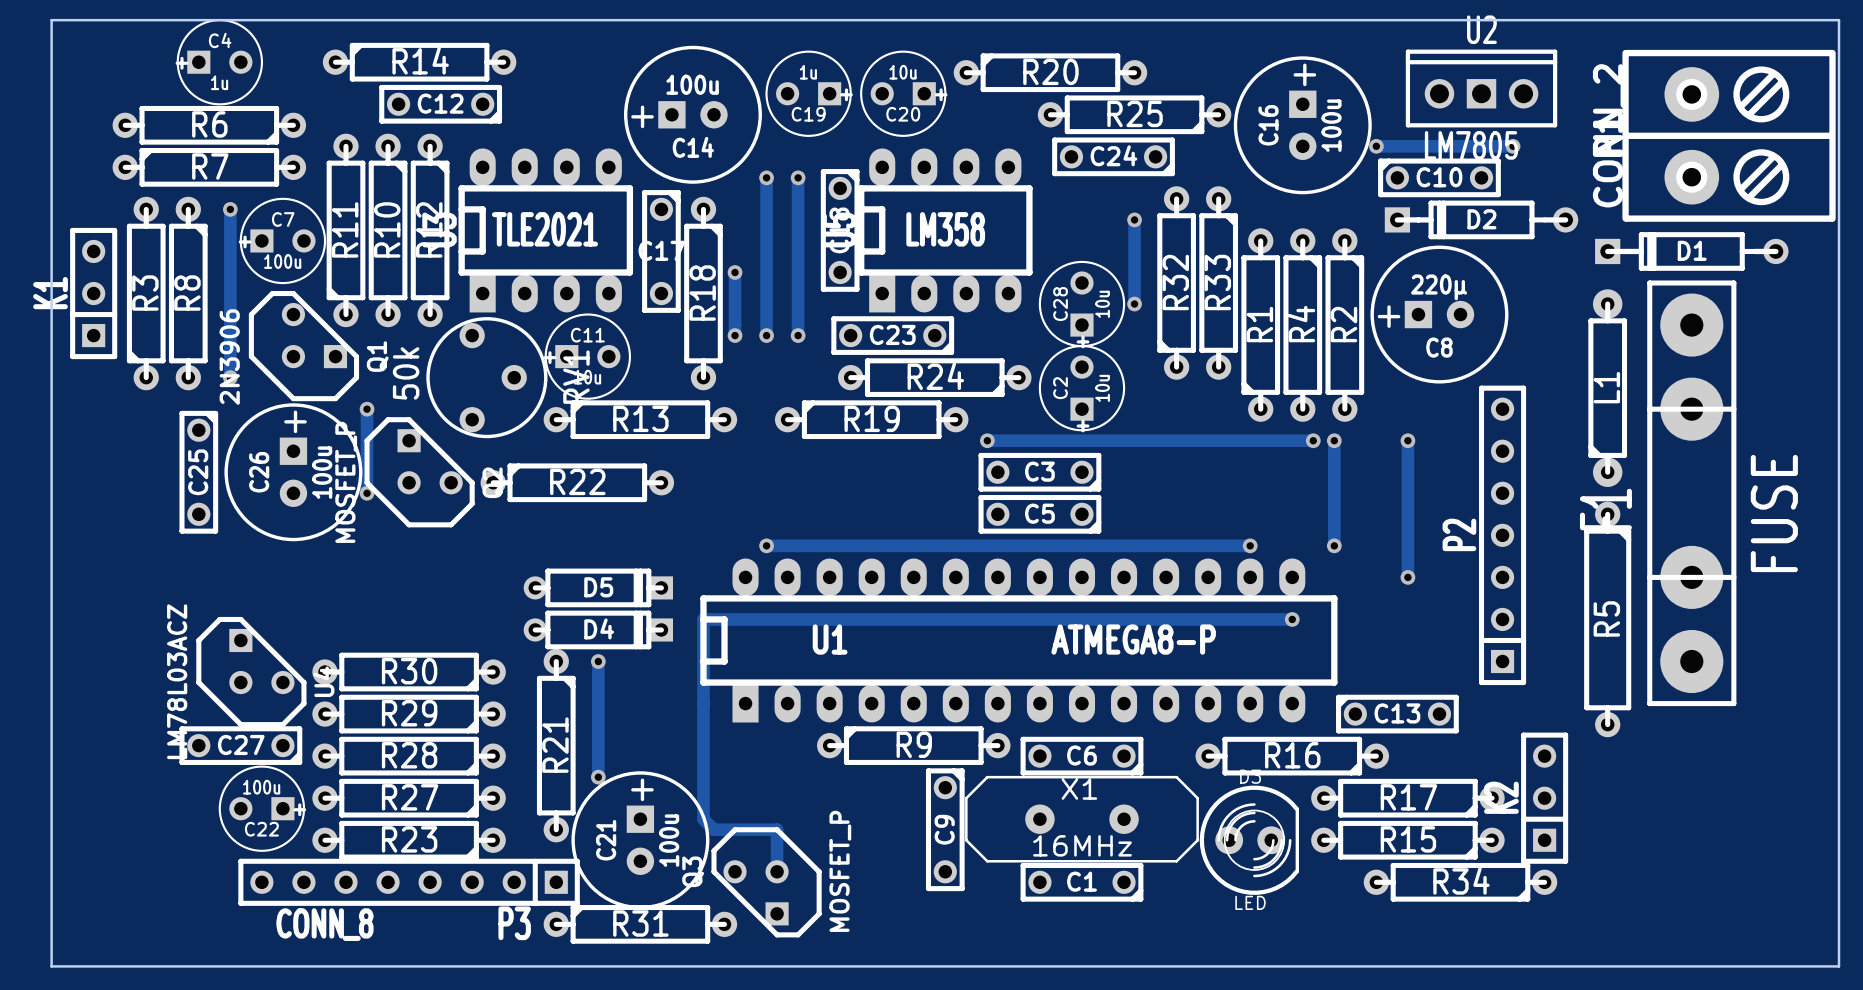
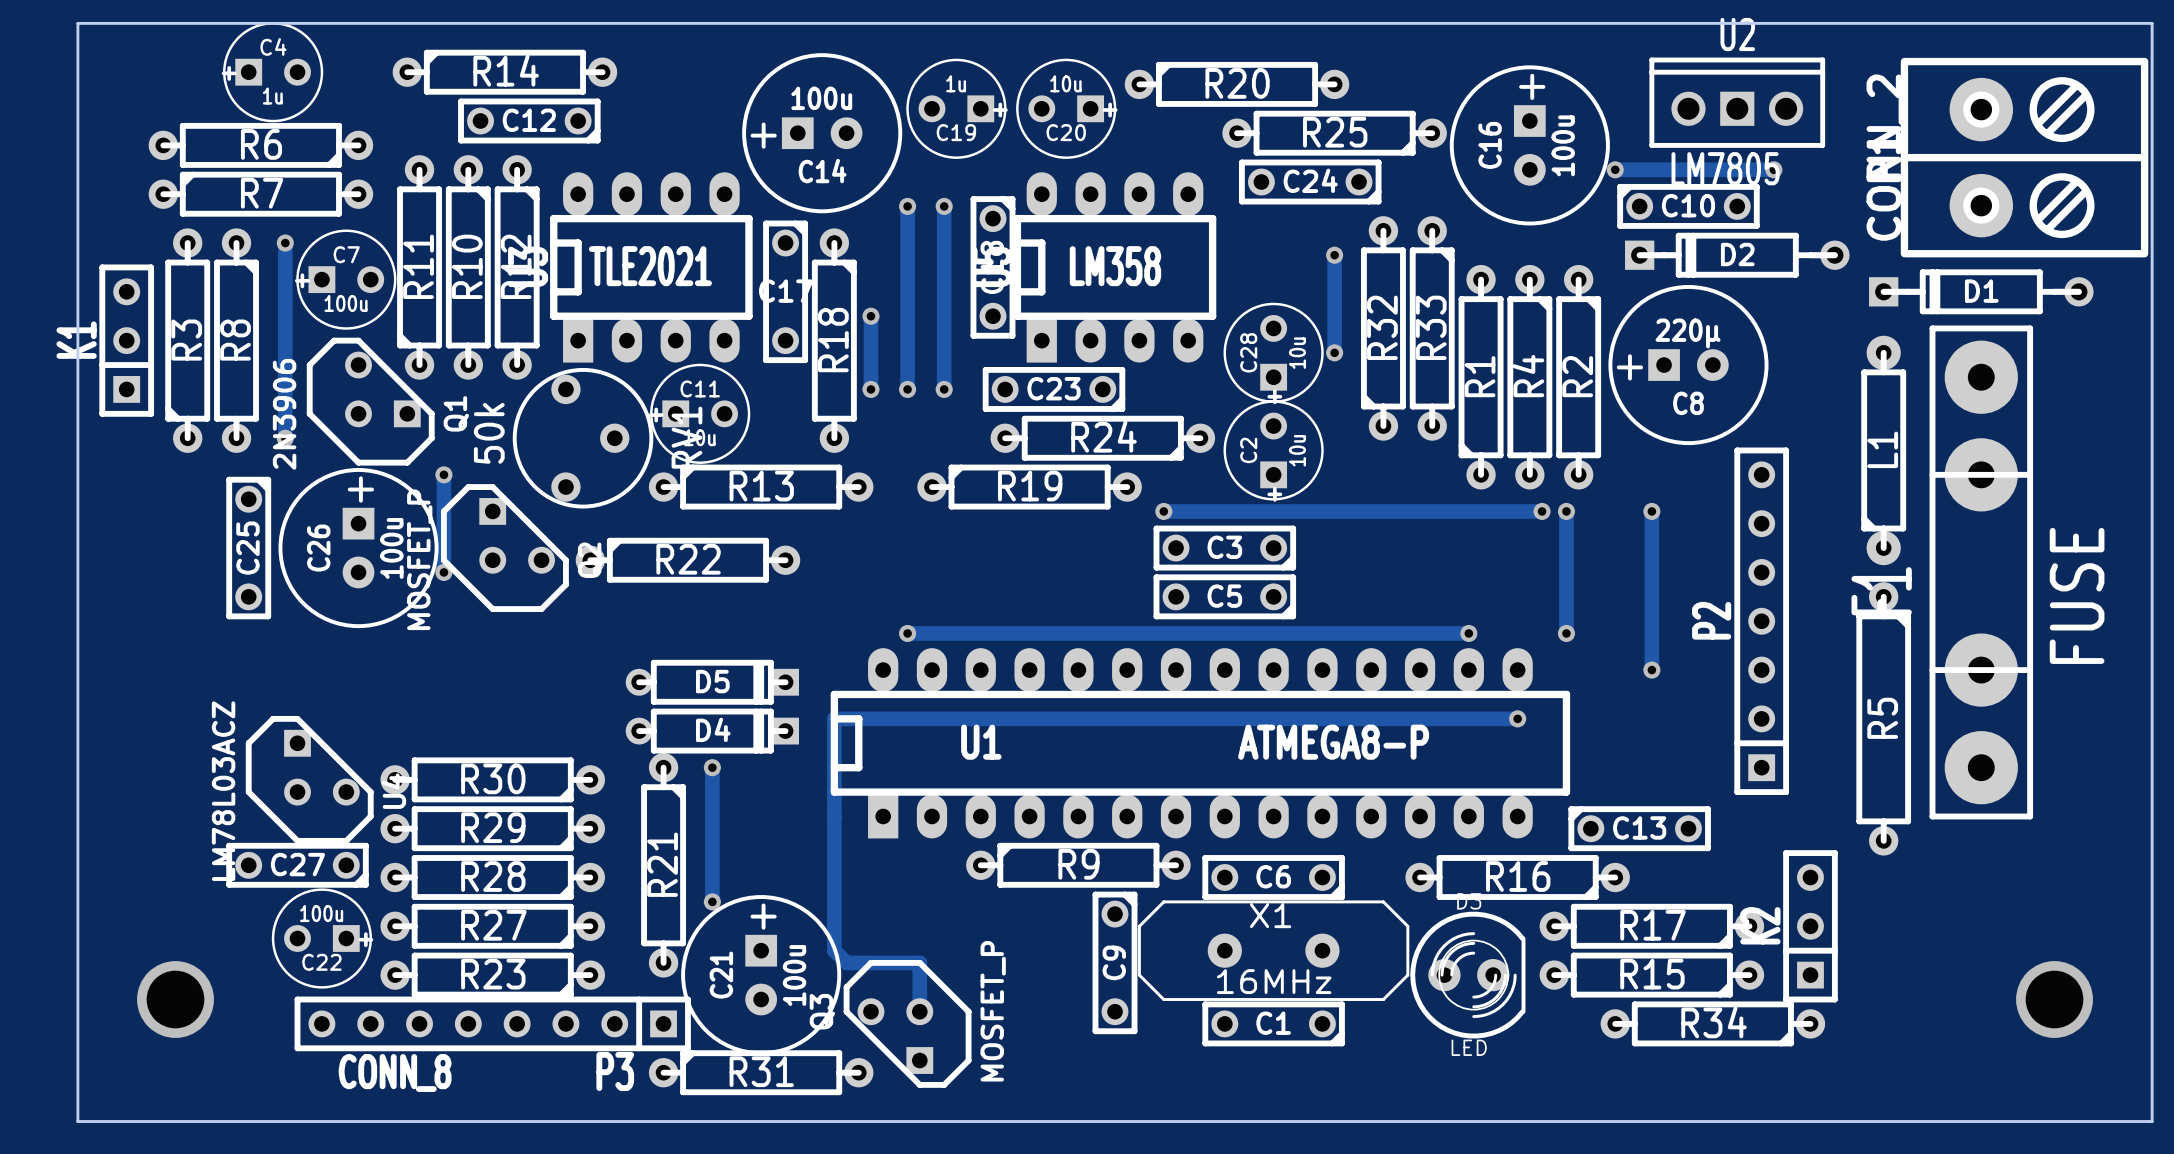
via: none -> (175, 999)
via: none -> (2054, 999)

